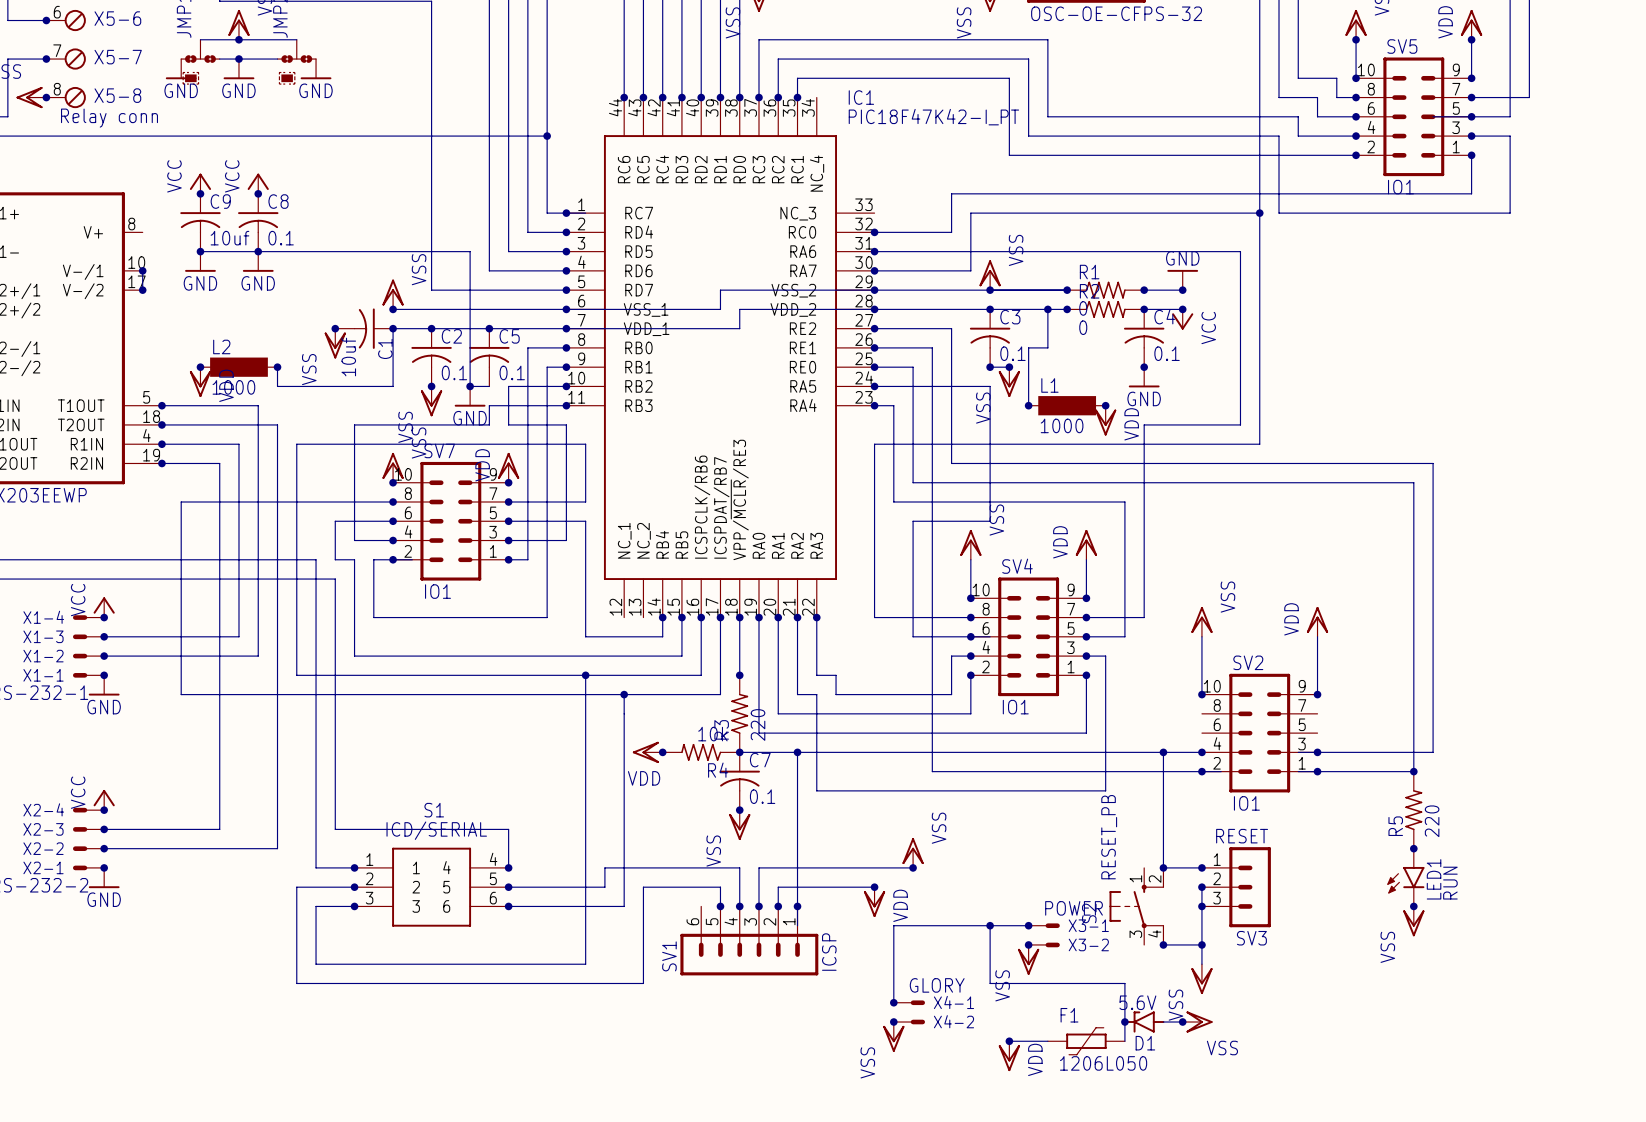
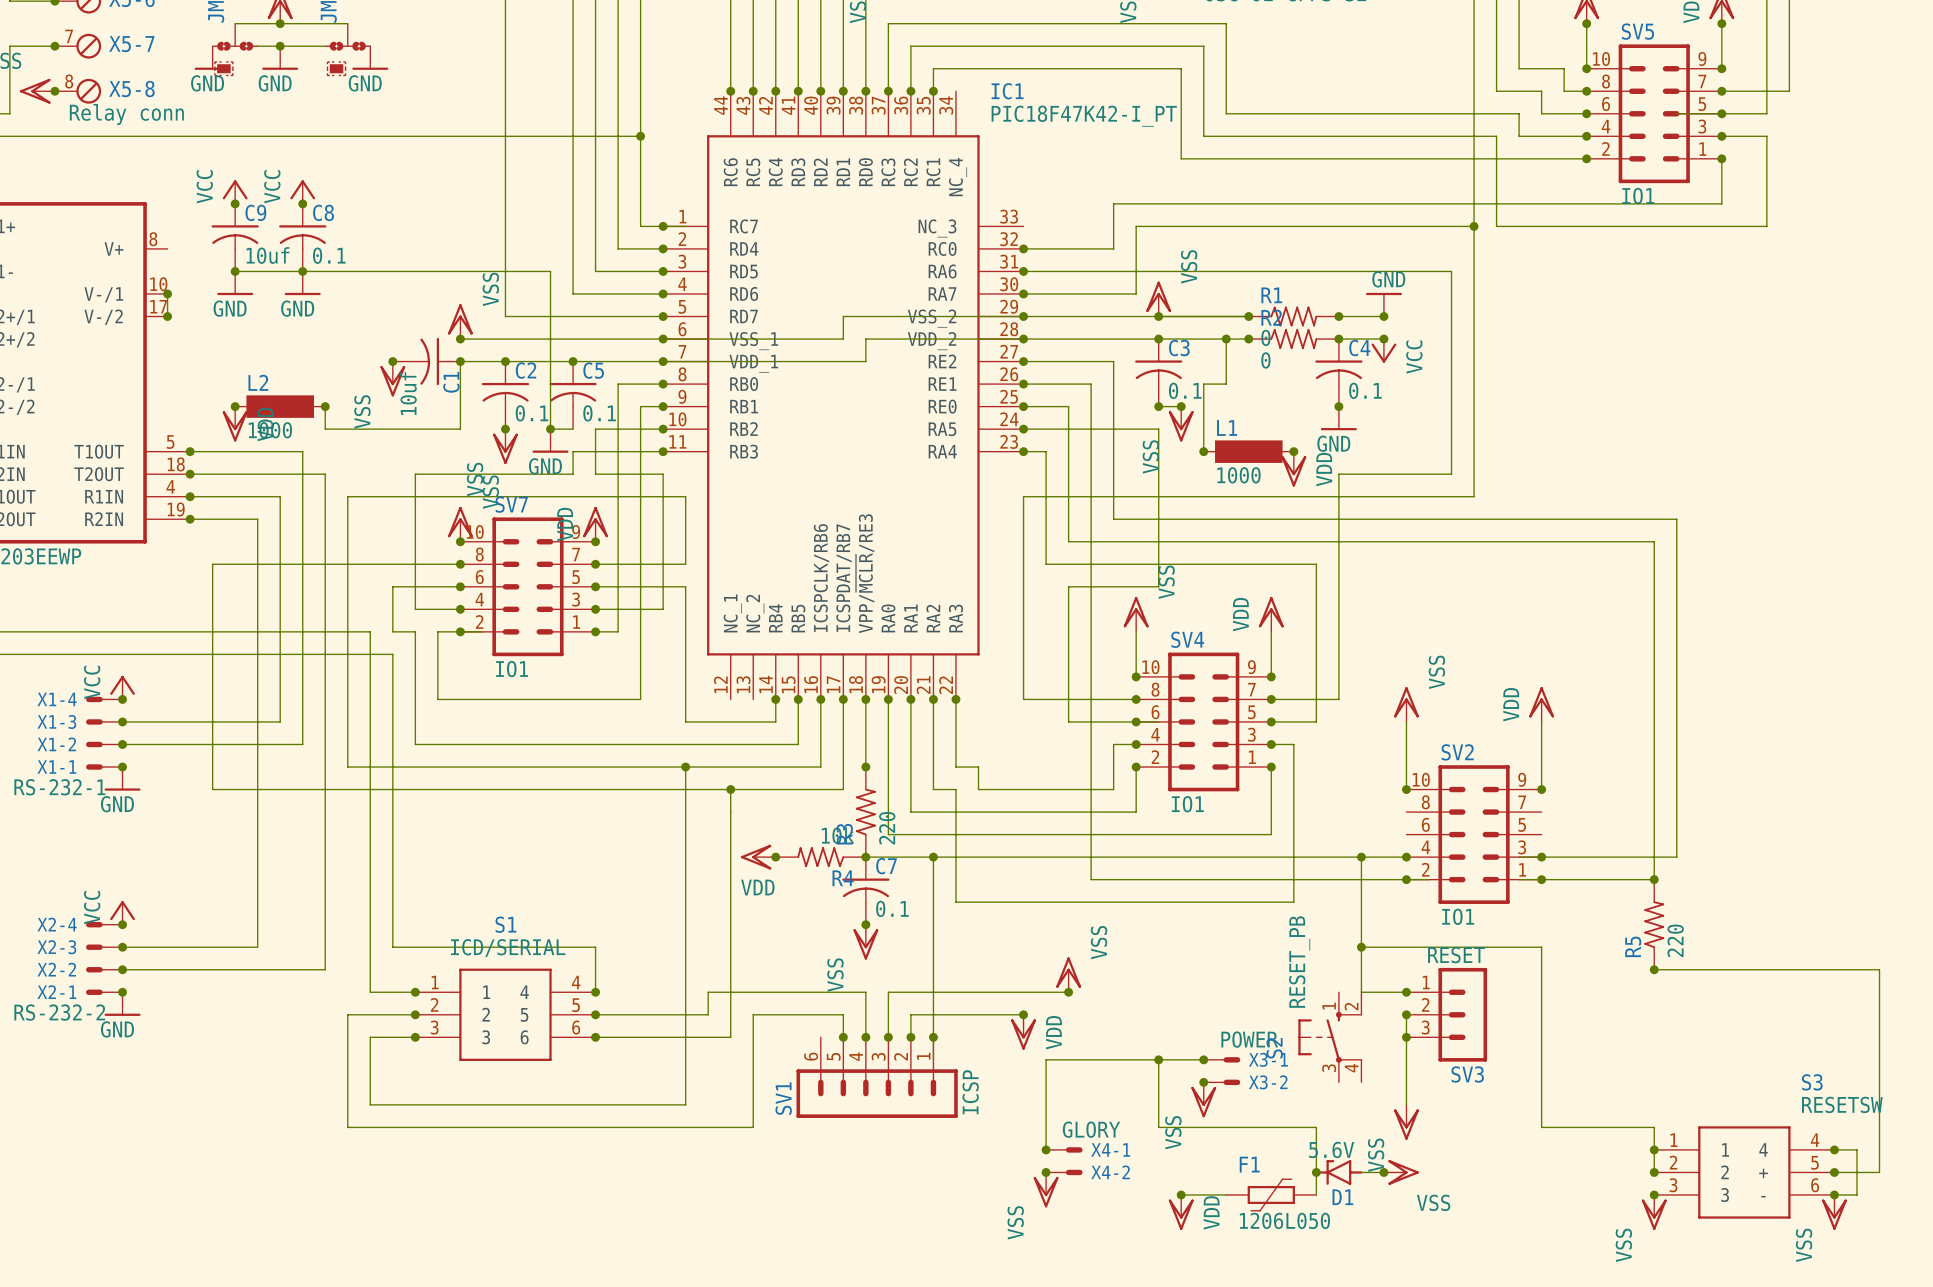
wire: none -> (1361, 947) (1541, 947) (1541, 1127) (1654, 1127) (1654, 1172)
wire: none -> (1654, 969) (1879, 969) (1879, 1172) (1834, 1172)
junction position: (1163, 867) -> (1361, 947)
LED1: RUN (1405, 877) -> none
junction: (1413, 906) -> none
power symbol: VSS (1413, 921) -> none
wire: (1163, 944) (1201, 944) -> none
junction: (1163, 944) -> none
junction: (1201, 944) -> none
junction: none -> (1654, 1149)
wire: none -> (1834, 1149) (1856, 1149) (1856, 1194) (1834, 1194)
junction: none -> (1834, 1149)
junction: none -> (1654, 1172)
S3: none -> RESETSW (1744, 1172)
junction: none -> (1834, 1172)
junction: none -> (1654, 1194)
junction: none -> (1834, 1194)
power symbol: none -> VSS (1654, 1212)
power symbol: none -> VSS (1834, 1212)

